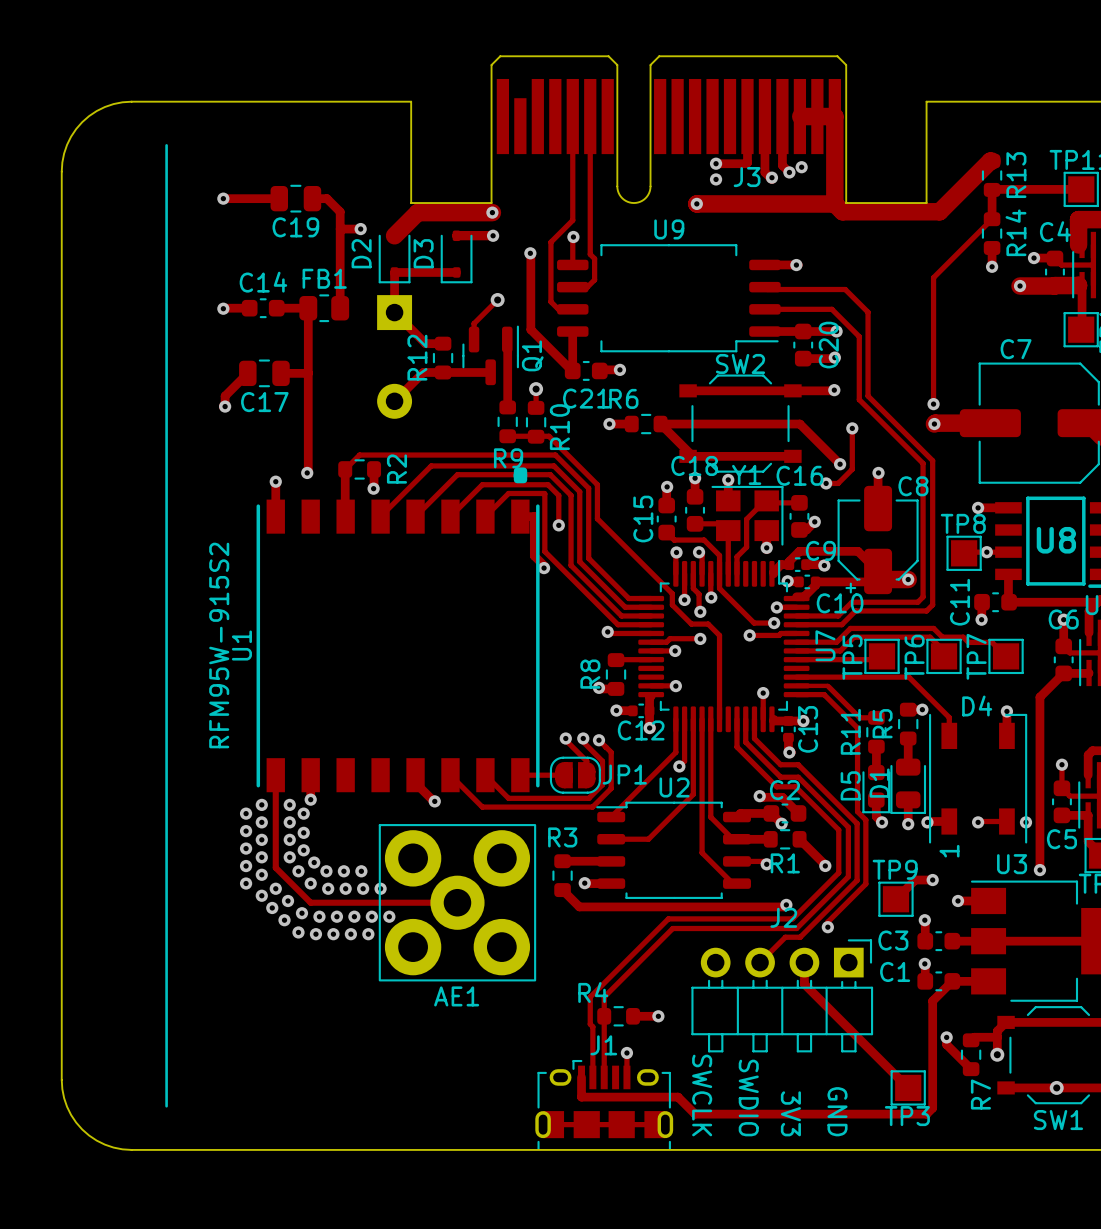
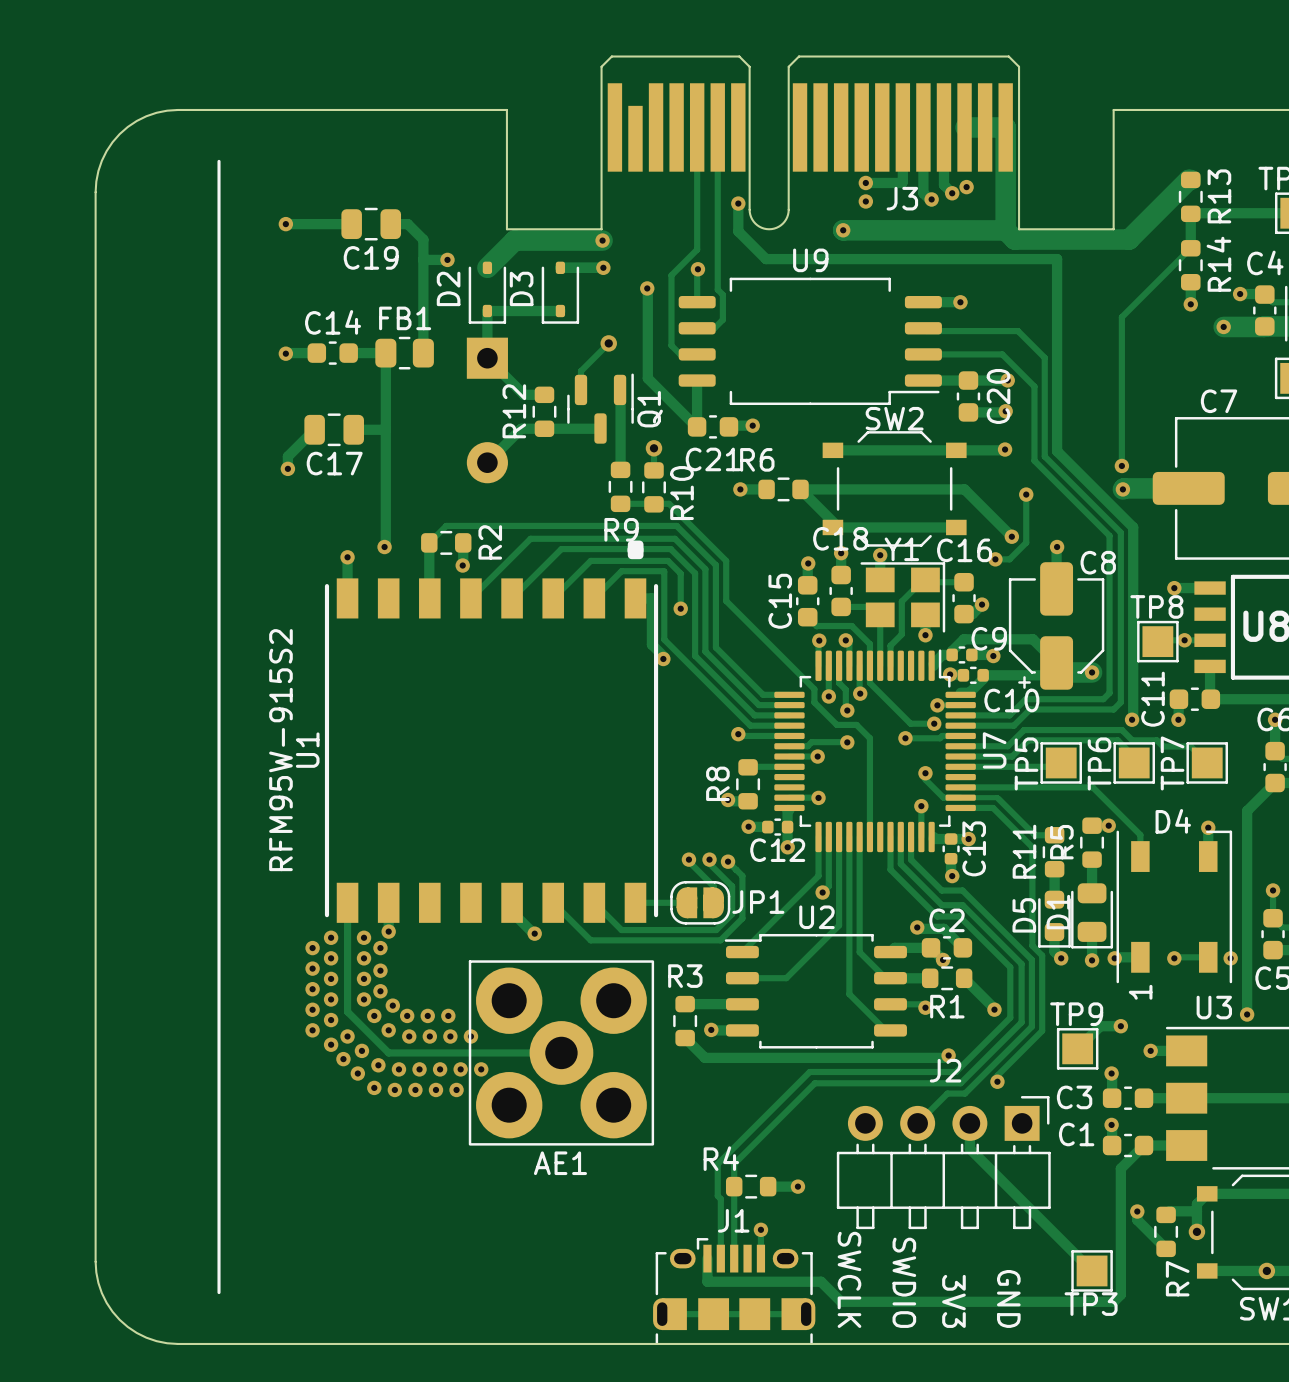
track: none -> (738, 203) (738, 231) (766, 259) (1057, 259) (1057, 451) (1133, 527) (1132, 720)
via: none -> (738, 203)
via: none -> (1132, 719)
track: none -> (925, 773) (925, 779) (943, 797) (960, 797)
via: none -> (925, 773)

